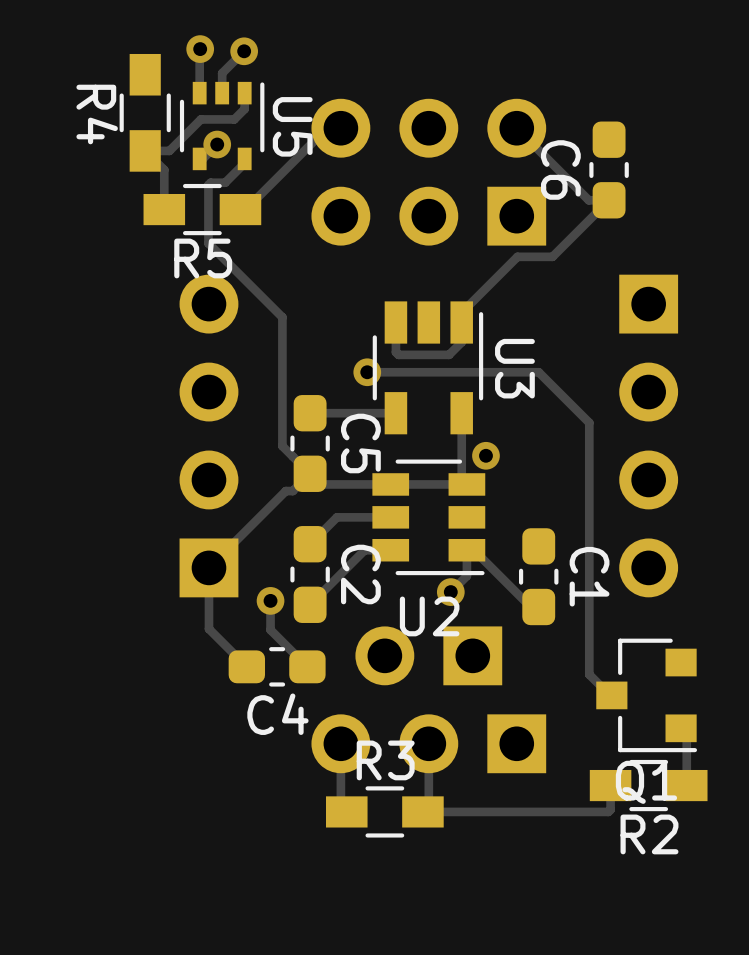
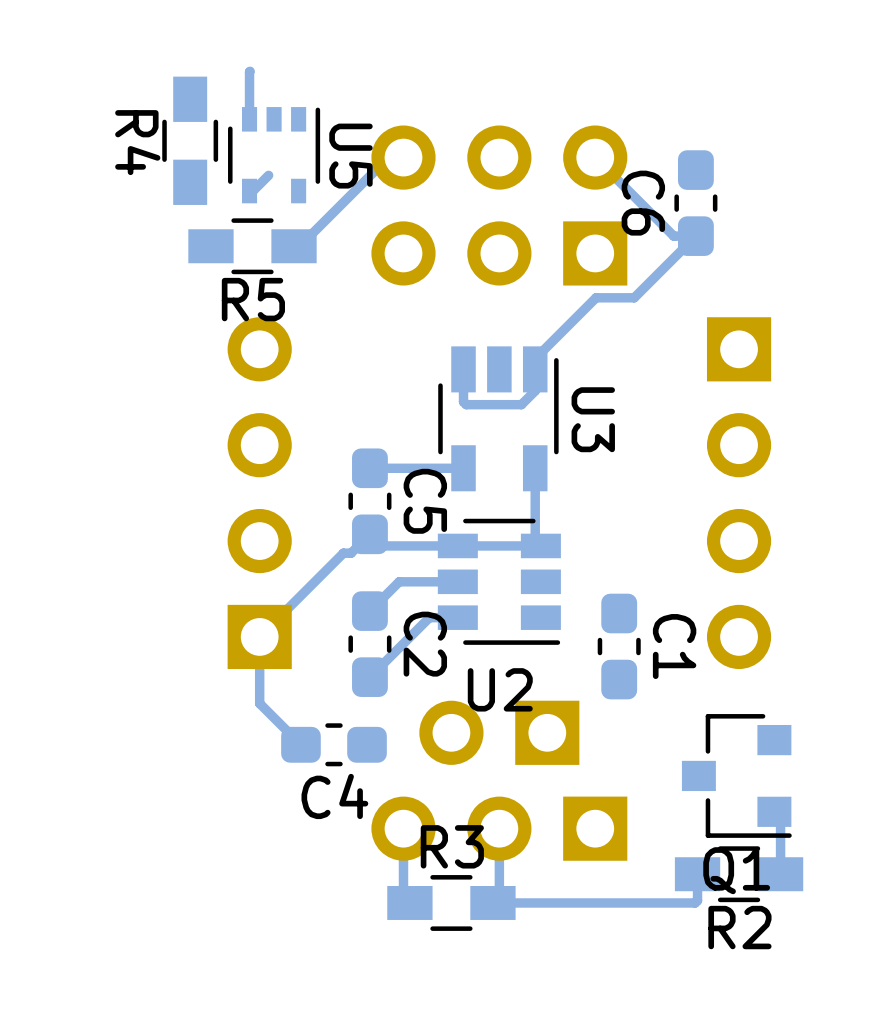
via: (200, 49) -> none
track: (244, 51) (222, 73) (222, 93) -> none
via: (244, 51) -> none
track: (244, 93) (244, 109) (234, 119) (200, 119) (169, 150) (145, 150) (164, 169) (164, 209) -> none
via: (217, 144) -> none
track: (244, 158) (244, 163) (225, 182) (210, 182) (208, 184) (208, 243) (282, 317) (282, 446) (310, 473) -> none
track: (367, 372) (538, 372) (589, 422) (589, 674) (611, 695) -> none
via: (367, 372) -> none
via: (485, 455) -> none
track: (450, 592) (466, 575) (466, 550) (474, 550) (530, 606) (538, 606) -> none
via: (450, 592) -> none
track: (270, 600) (270, 629) (307, 666) -> none
via: (270, 600) -> none

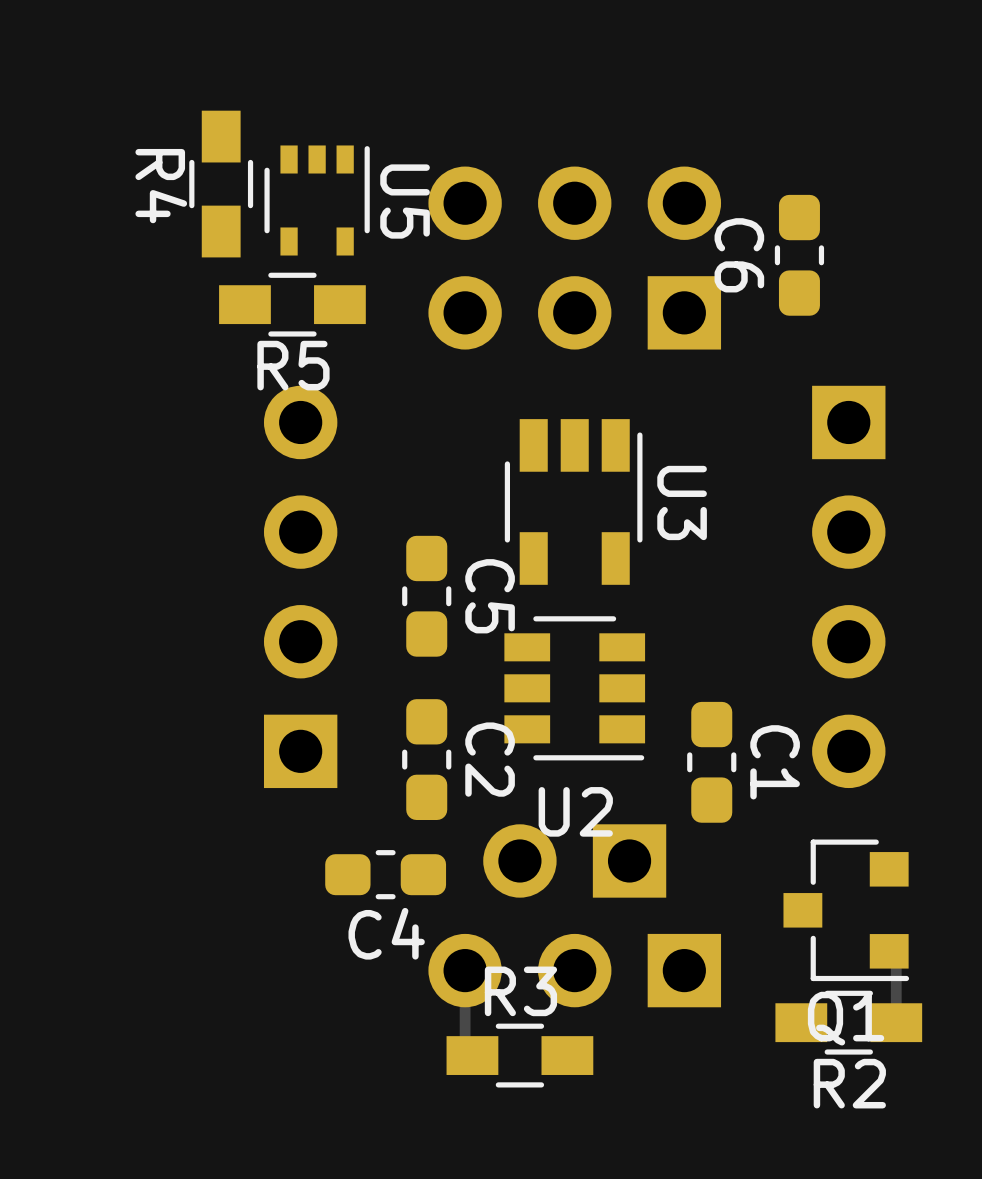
track: (250, 71) (249, 119) -> none
track: (403, 157) (388, 157) (299, 246) (294, 246) -> none
track: (595, 157) (673, 236) (695, 236) (634, 297) (596, 297) (535, 358) (535, 390) (521, 404) (466, 404) (463, 401) (463, 369) -> none
track: (268, 175) (252, 191) (249, 191) -> none
track: (463, 468) (369, 468) -> none
track: (535, 468) (535, 540) (540, 545) (381, 545) (369, 534) (351, 553) (343, 553) (259, 636) (259, 703) (300, 744) -> none
track: (457, 581) (399, 581) (369, 611) -> none
track: (457, 617) (429, 617) (369, 677) -> none
track: (499, 828) (499, 896) (492, 902) (695, 902) (697, 900) (697, 874) -> none

